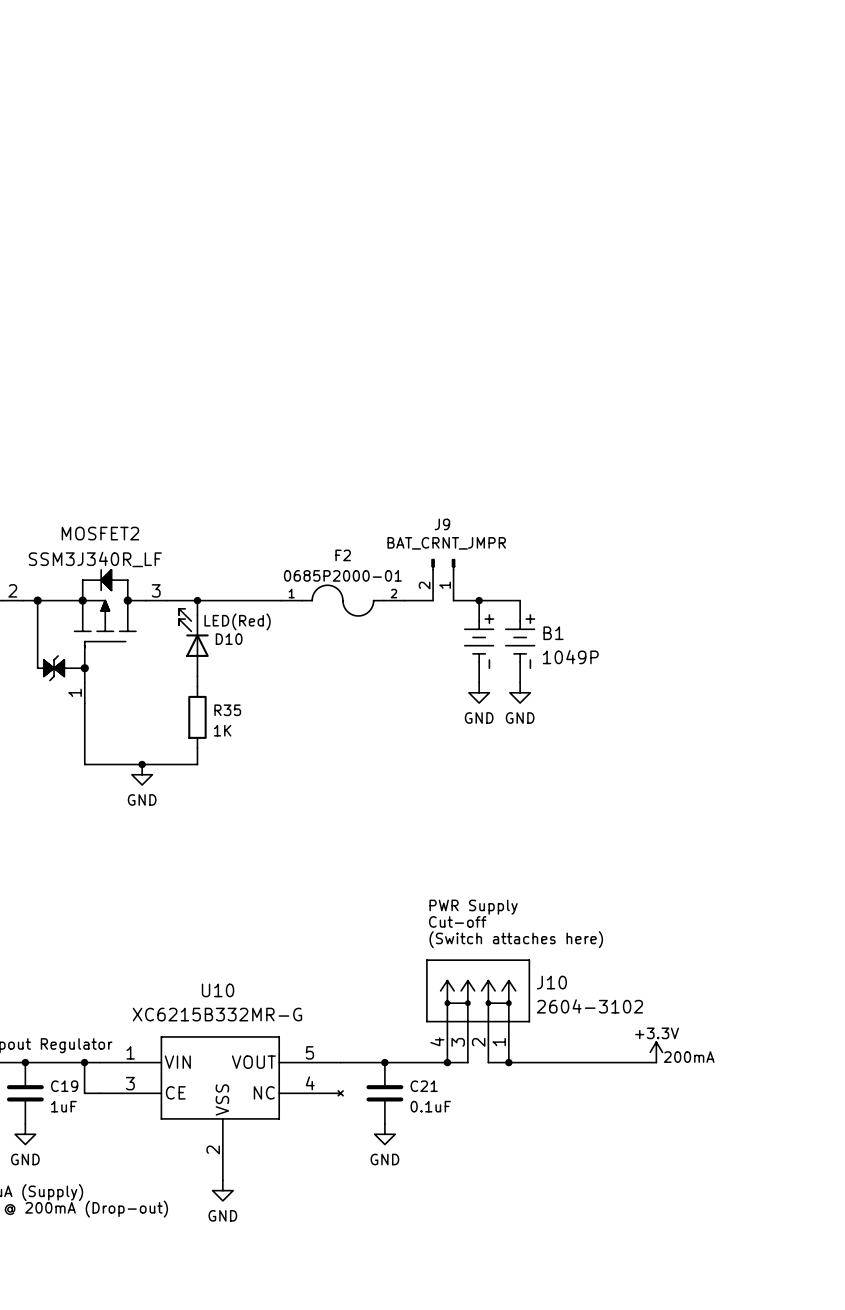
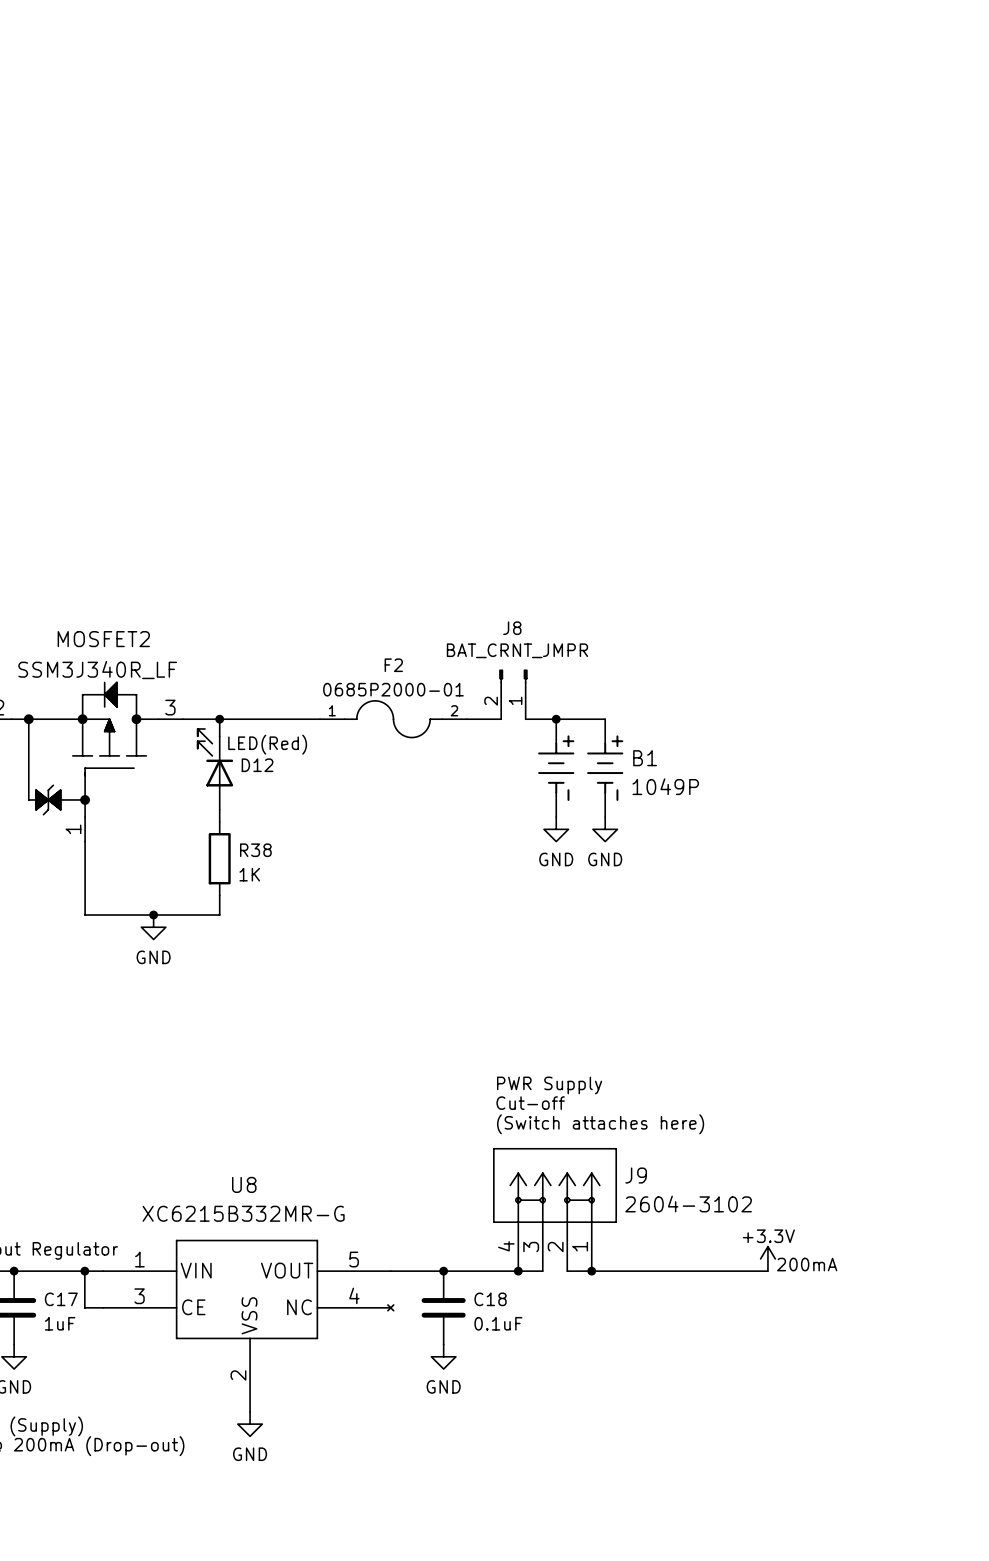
J9 name: J9 (442, 524) -> J8 (512, 628)
D10 name: D10 (229, 639) -> D12 (257, 765)
R35 name: R35 (227, 710) -> R38 (255, 850)
J10 name: J10 (551, 982) -> J9 (636, 1175)
U10 name: U10 (218, 990) -> U8 (244, 1184)
C19 name: C19 (64, 1086) -> C17 (61, 1299)
C21 name: C21 (424, 1086) -> C18 (490, 1299)

